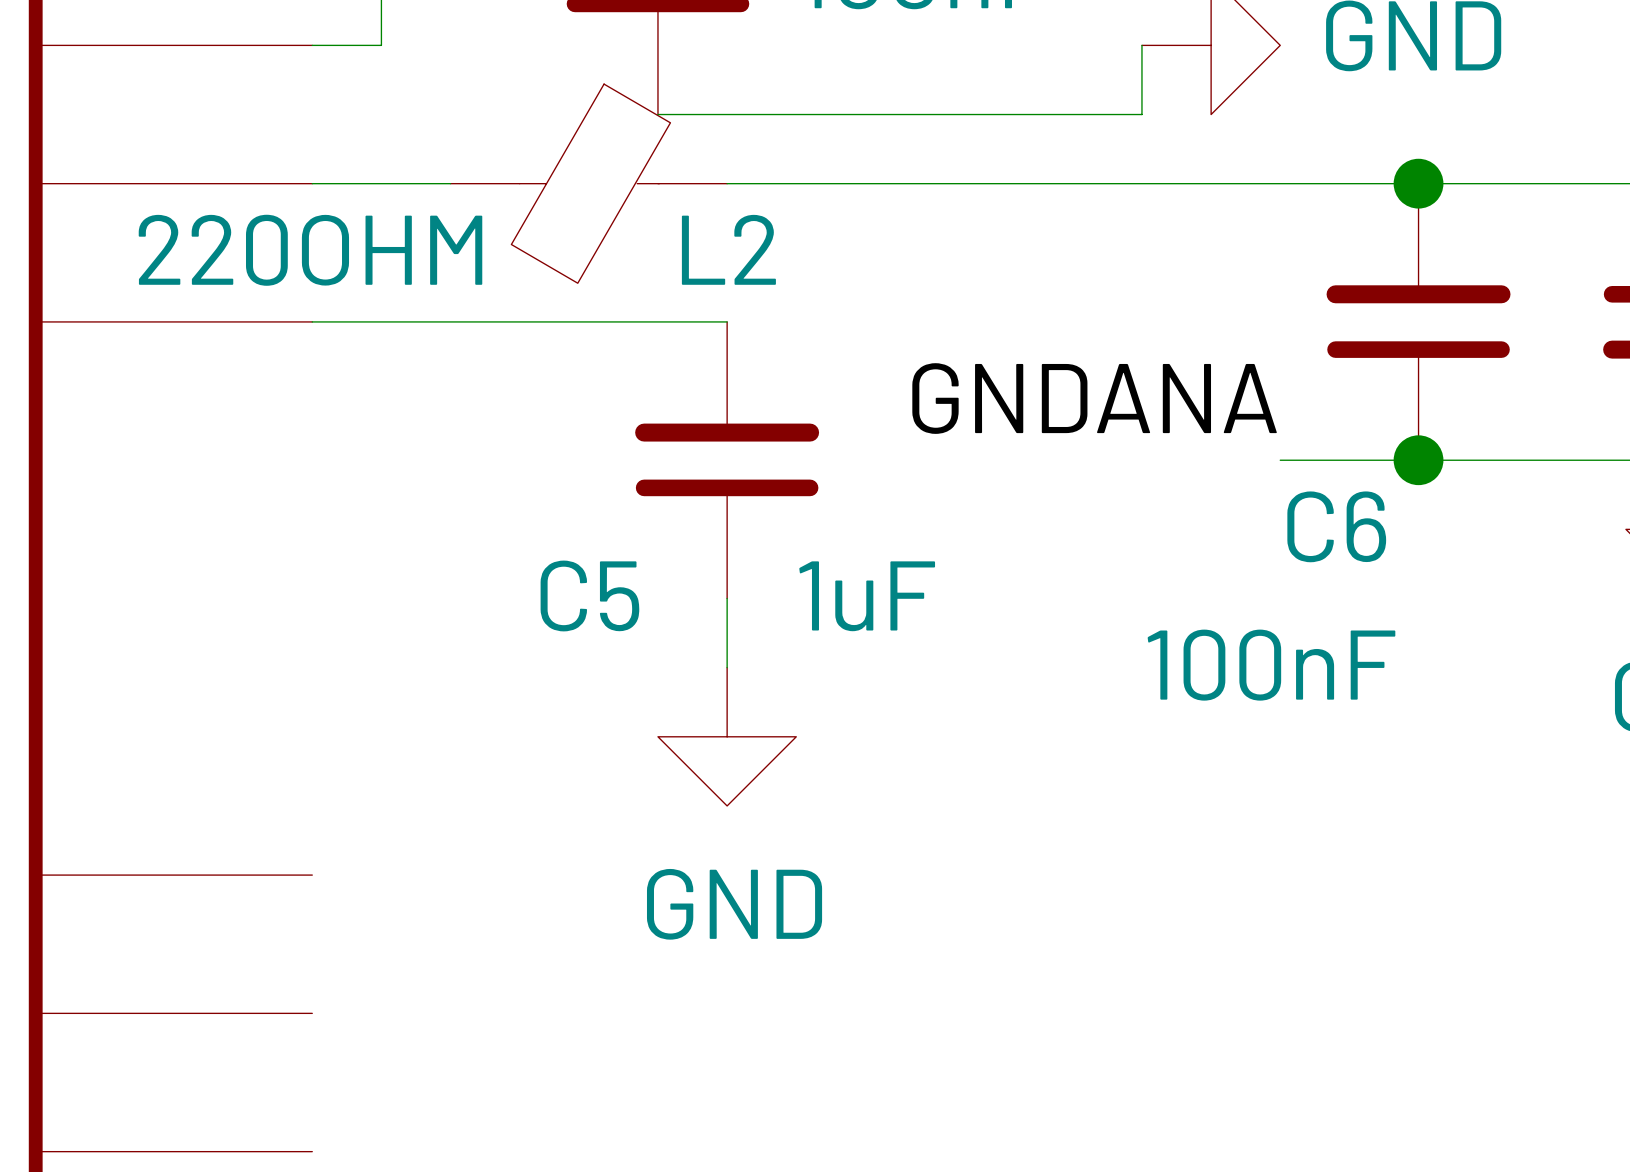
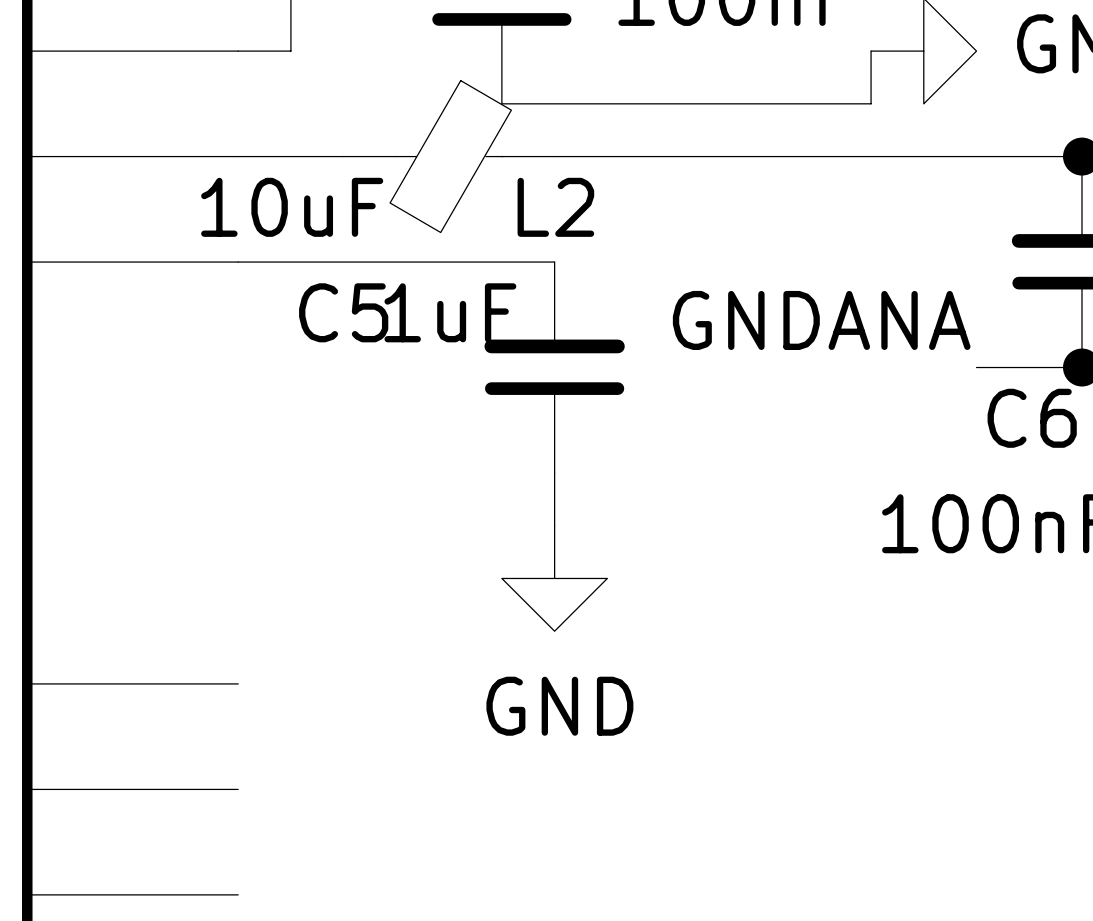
L2 value: 220OHM (310, 250) -> 10uF (292, 207)
C5 name position: C5 (589, 595) -> C5 (343, 312)
C5 value position: 1uF (867, 596) -> 1uF (450, 312)

